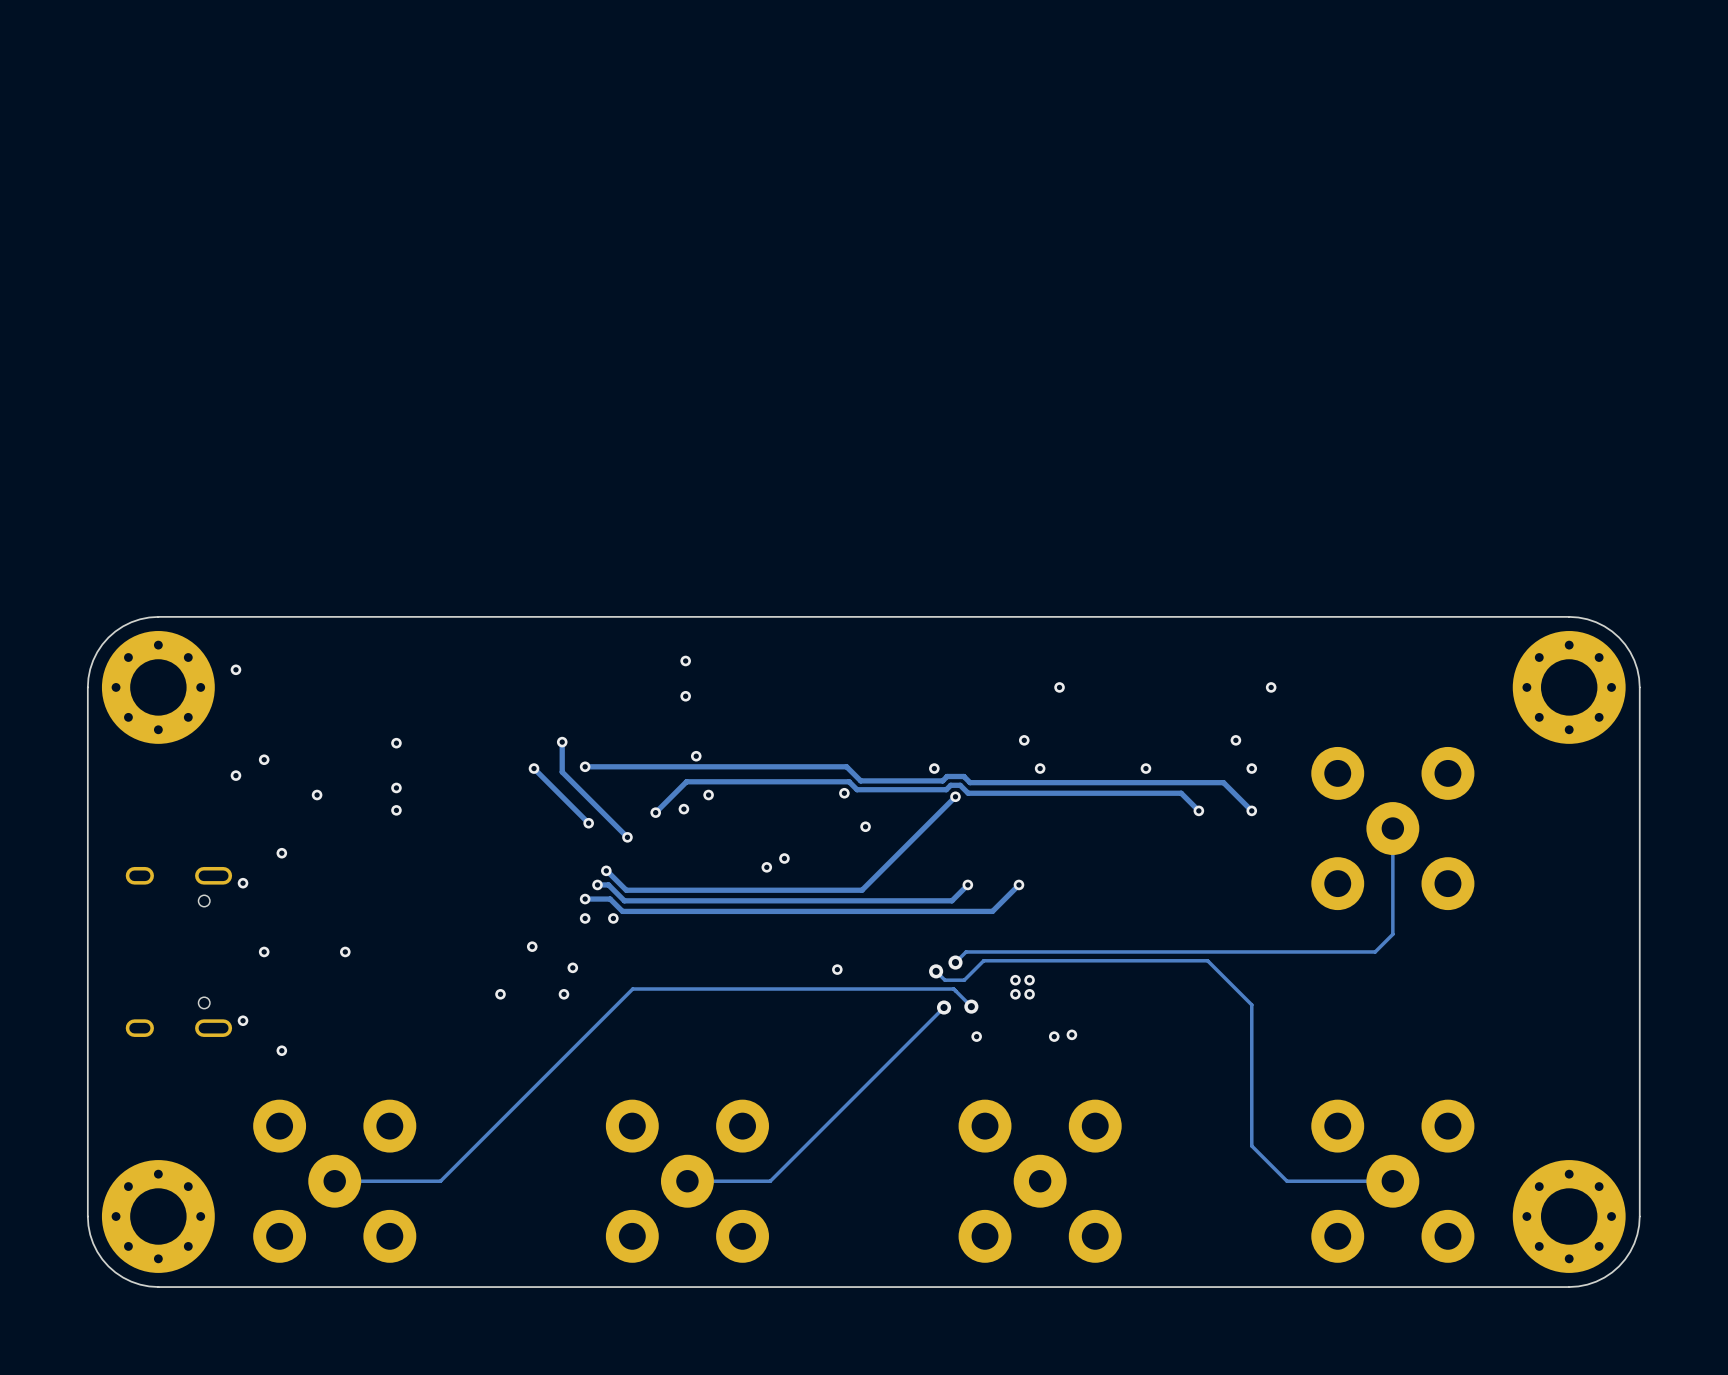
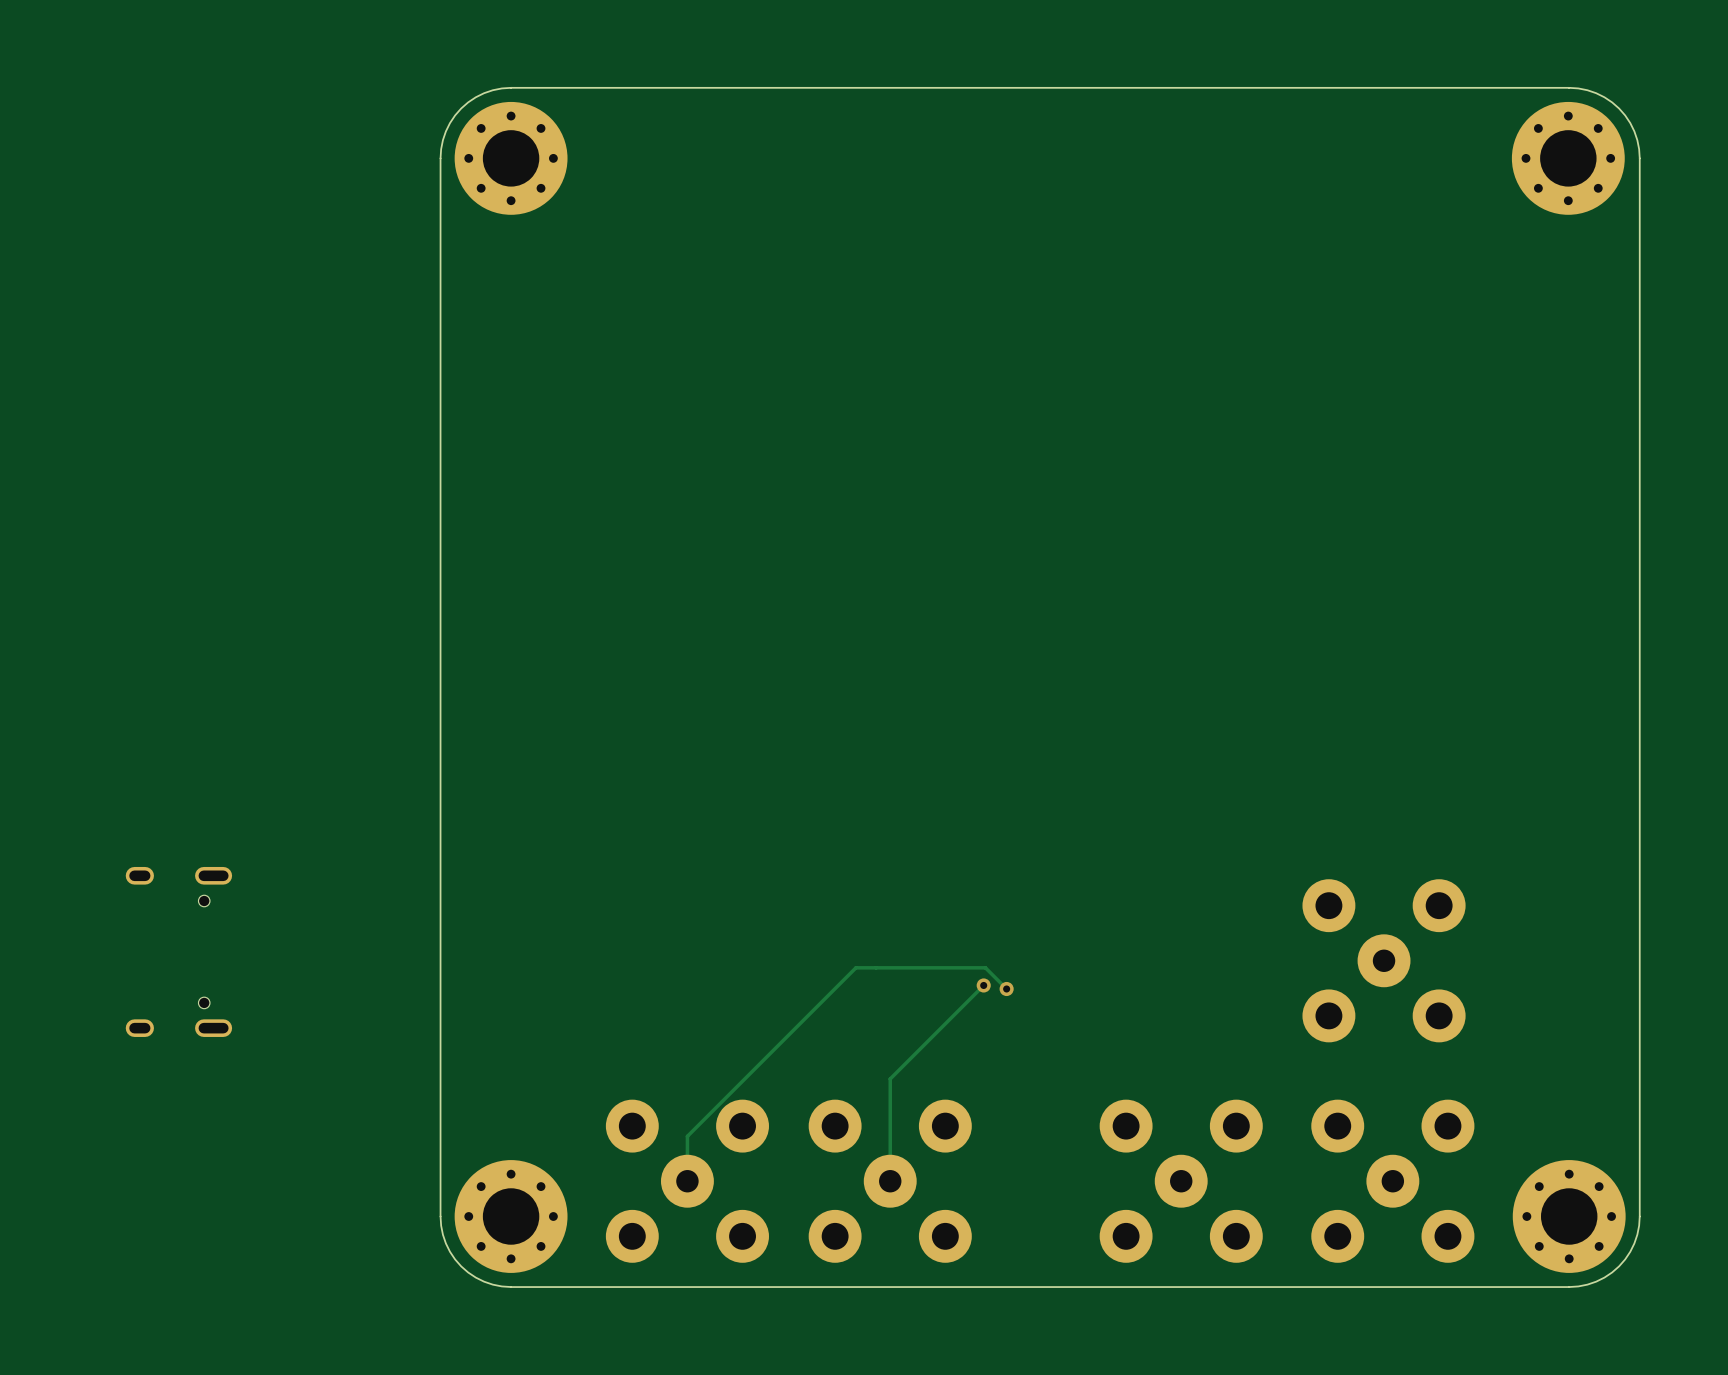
part: none -> (511, 158)
part: none -> (1568, 158)
via: (685, 660) -> none
via: (235, 669) -> none
part: (158, 687) -> none
via: (1059, 687) -> none
via: (1271, 687) -> none
part: (1569, 687) -> none
board edge: (1639, 687) (1634, 660) (1619, 637) (1596, 622) (1569, 616) (158, 616) (140, 619) (123, 626) (108, 637) (97, 652) (90, 669) (87, 687) (87, 1216) (90, 1234) (97, 1251) (115, 1272) (131, 1281) (149, 1286) (511, 1287) -> (1639, 687) (1639, 158) (1637, 140) (1630, 123) (1619, 108) (1604, 97) (1587, 90) (1569, 87) (511, 87) (492, 90) (475, 97) (461, 108) (449, 123) (442, 140) (440, 158) (440, 1216) (445, 1243) (461, 1266) (484, 1281) (511, 1287)
via: (685, 696) -> none
via: (1024, 740) -> none
via: (1235, 740) -> none
track: (562, 742) (562, 772) (627, 837) -> none
via: (562, 742) -> none
via: (396, 743) -> none
via: (696, 756) -> none
via: (264, 759) -> none
track: (585, 766) (846, 766) (860, 780) (942, 780) (947, 776) (963, 776) (970, 782) (1223, 782) (1251, 810) -> none
via: (585, 766) -> none
track: (534, 768) (588, 823) -> none
via: (534, 768) -> none
via: (934, 768) -> none
via: (1040, 768) -> none
via: (1145, 768) -> none
via: (1251, 768) -> none
via: (235, 775) -> none
via: (396, 787) -> none
via: (844, 793) -> none
via: (317, 795) -> none
via: (708, 795) -> none
track: (955, 796) (862, 890) (626, 890) (606, 870) -> none
via: (955, 796) -> none
via: (683, 809) -> none
via: (396, 810) -> none
track: (1198, 810) (1181, 793) (968, 793) (960, 785) (950, 785) (946, 789) (857, 789) (849, 781) (686, 781) (655, 812) -> none
via: (1198, 810) -> none
via: (1251, 810) -> none
via: (655, 812) -> none
via: (588, 823) -> none
via: (865, 826) -> none
track: (1392, 828) (1392, 934) (1375, 951) (966, 951) (955, 962) -> none
part position: (1392, 828) -> (1384, 960)
via: (627, 837) -> none
via: (281, 853) -> none
via: (784, 858) -> none
via: (766, 867) -> none
via: (606, 870) -> none
via: (243, 883) -> none
via: (597, 884) -> none
track: (967, 884) (951, 900) (624, 900) (608, 884) (597, 884) -> none
via: (967, 884) -> none
track: (1018, 884) (992, 911) (622, 911) (610, 899) (585, 899) -> none
via: (1018, 884) -> none
via: (585, 899) -> none
via: (585, 918) -> none
via: (613, 918) -> none
via: (532, 946) -> none
via: (264, 951) -> none
via: (345, 951) -> none
via: (955, 962) -> none
via: (572, 967) -> none
via: (837, 969) -> none
track: (936, 971) (944, 980) (964, 980) (983, 960) (1207, 960) (1251, 1004) (1251, 1145) (1287, 1181) (1392, 1181) -> none
via: (936, 971) -> none
via: (1015, 980) -> none
via: (1029, 980) -> none
track: none -> (983, 985) (890, 1078) (890, 1181)
via: none -> (983, 985)
via: none -> (1006, 988)
via: (500, 994) -> none
via: (563, 994) -> none
via: (1015, 994) -> none
via: (1029, 994) -> none
track: (971, 1006) (953, 989) (632, 989) (440, 1181) (334, 1181) -> none
via: (971, 1006) -> none
track: (944, 1007) (770, 1181) (687, 1181) -> (1006, 988) (985, 967) (855, 967) (687, 1136) (687, 1181)
via: (944, 1007) -> none
via: (243, 1020) -> none
via: (1071, 1034) -> none
via: (976, 1036) -> none
via: (1054, 1036) -> none
via: (281, 1050) -> none
part: (334, 1181) -> none
part: none -> (890, 1181)
part: (1040, 1181) -> none
part: none -> (1181, 1181)
part: (158, 1216) -> none
part: none -> (511, 1216)

